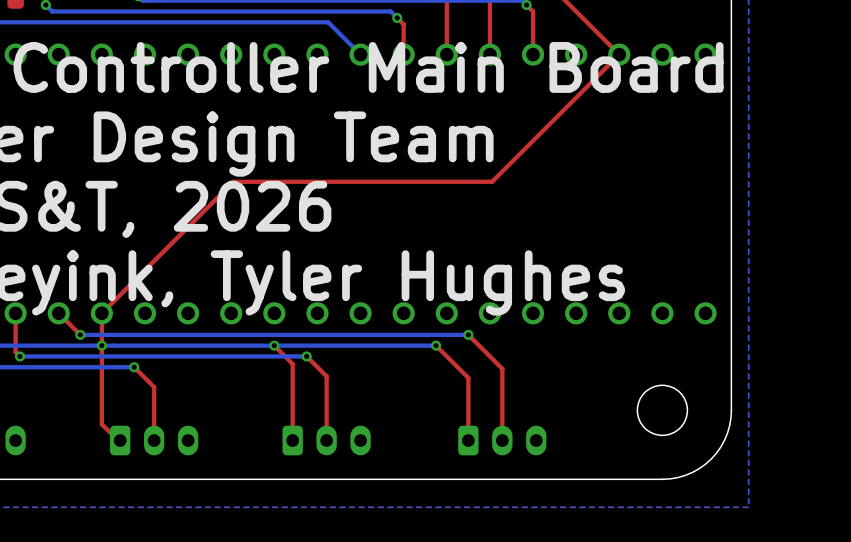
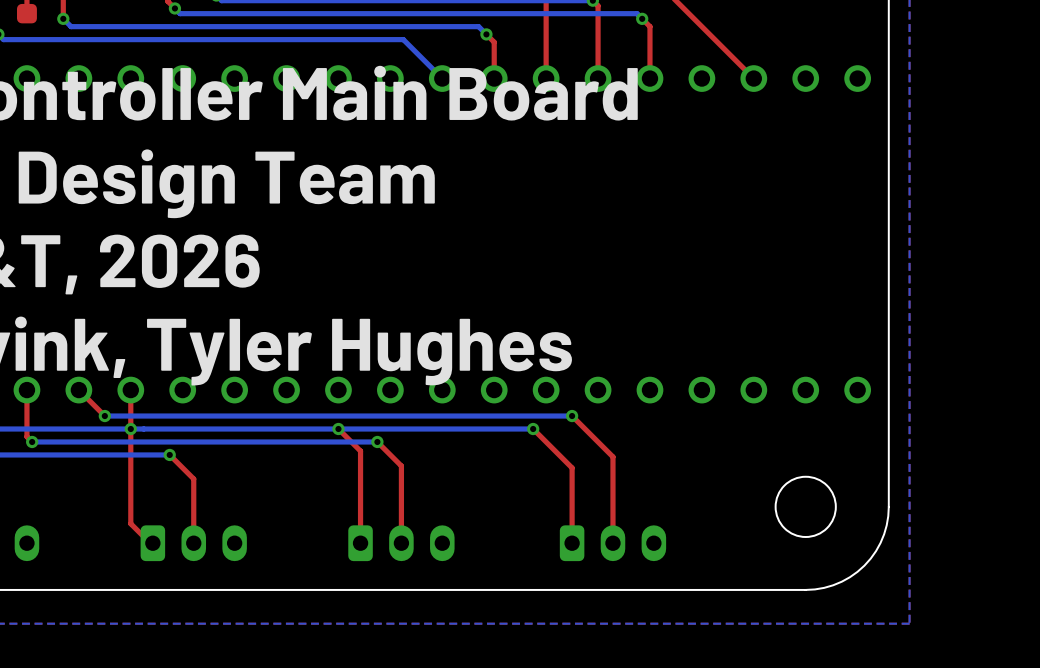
top track: (619, 54) (492, 181) (233, 181) (101, 313) -> none

